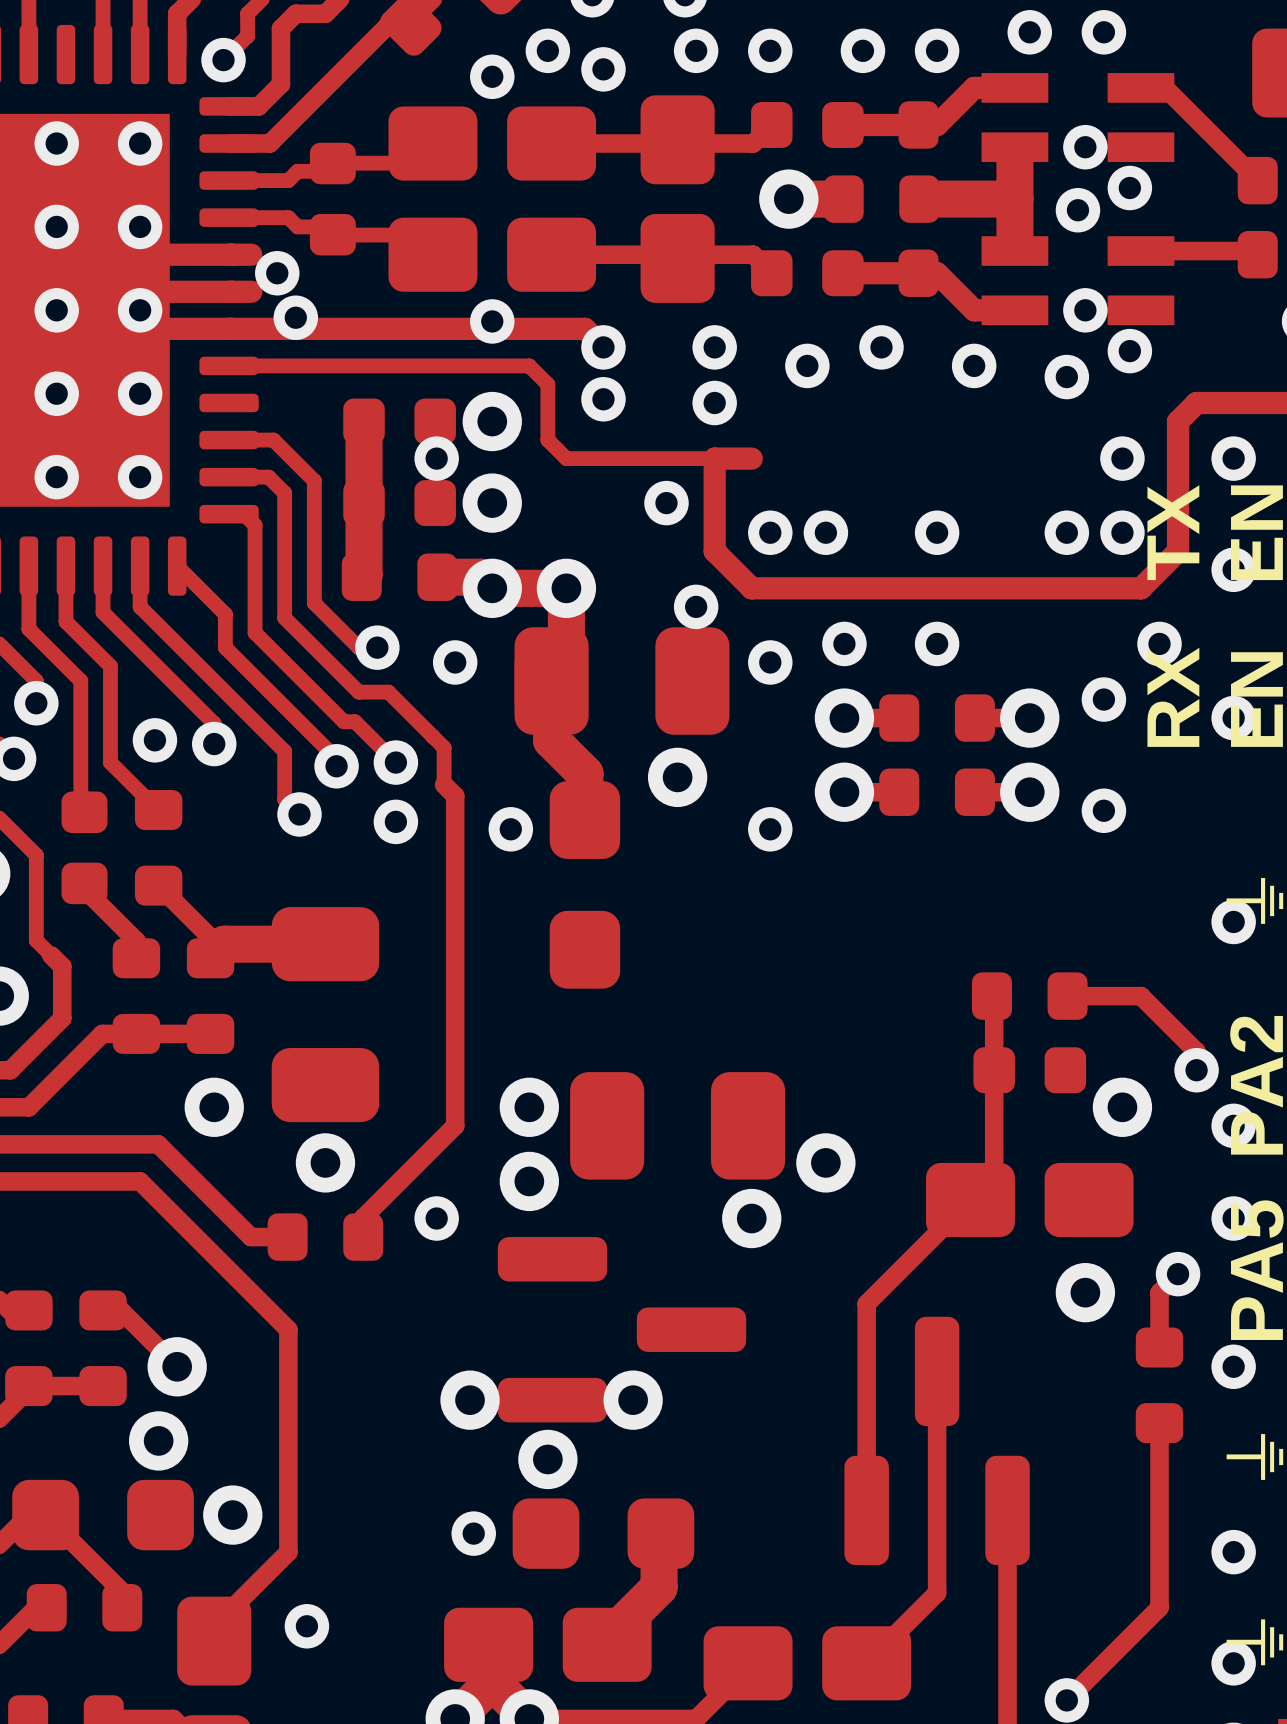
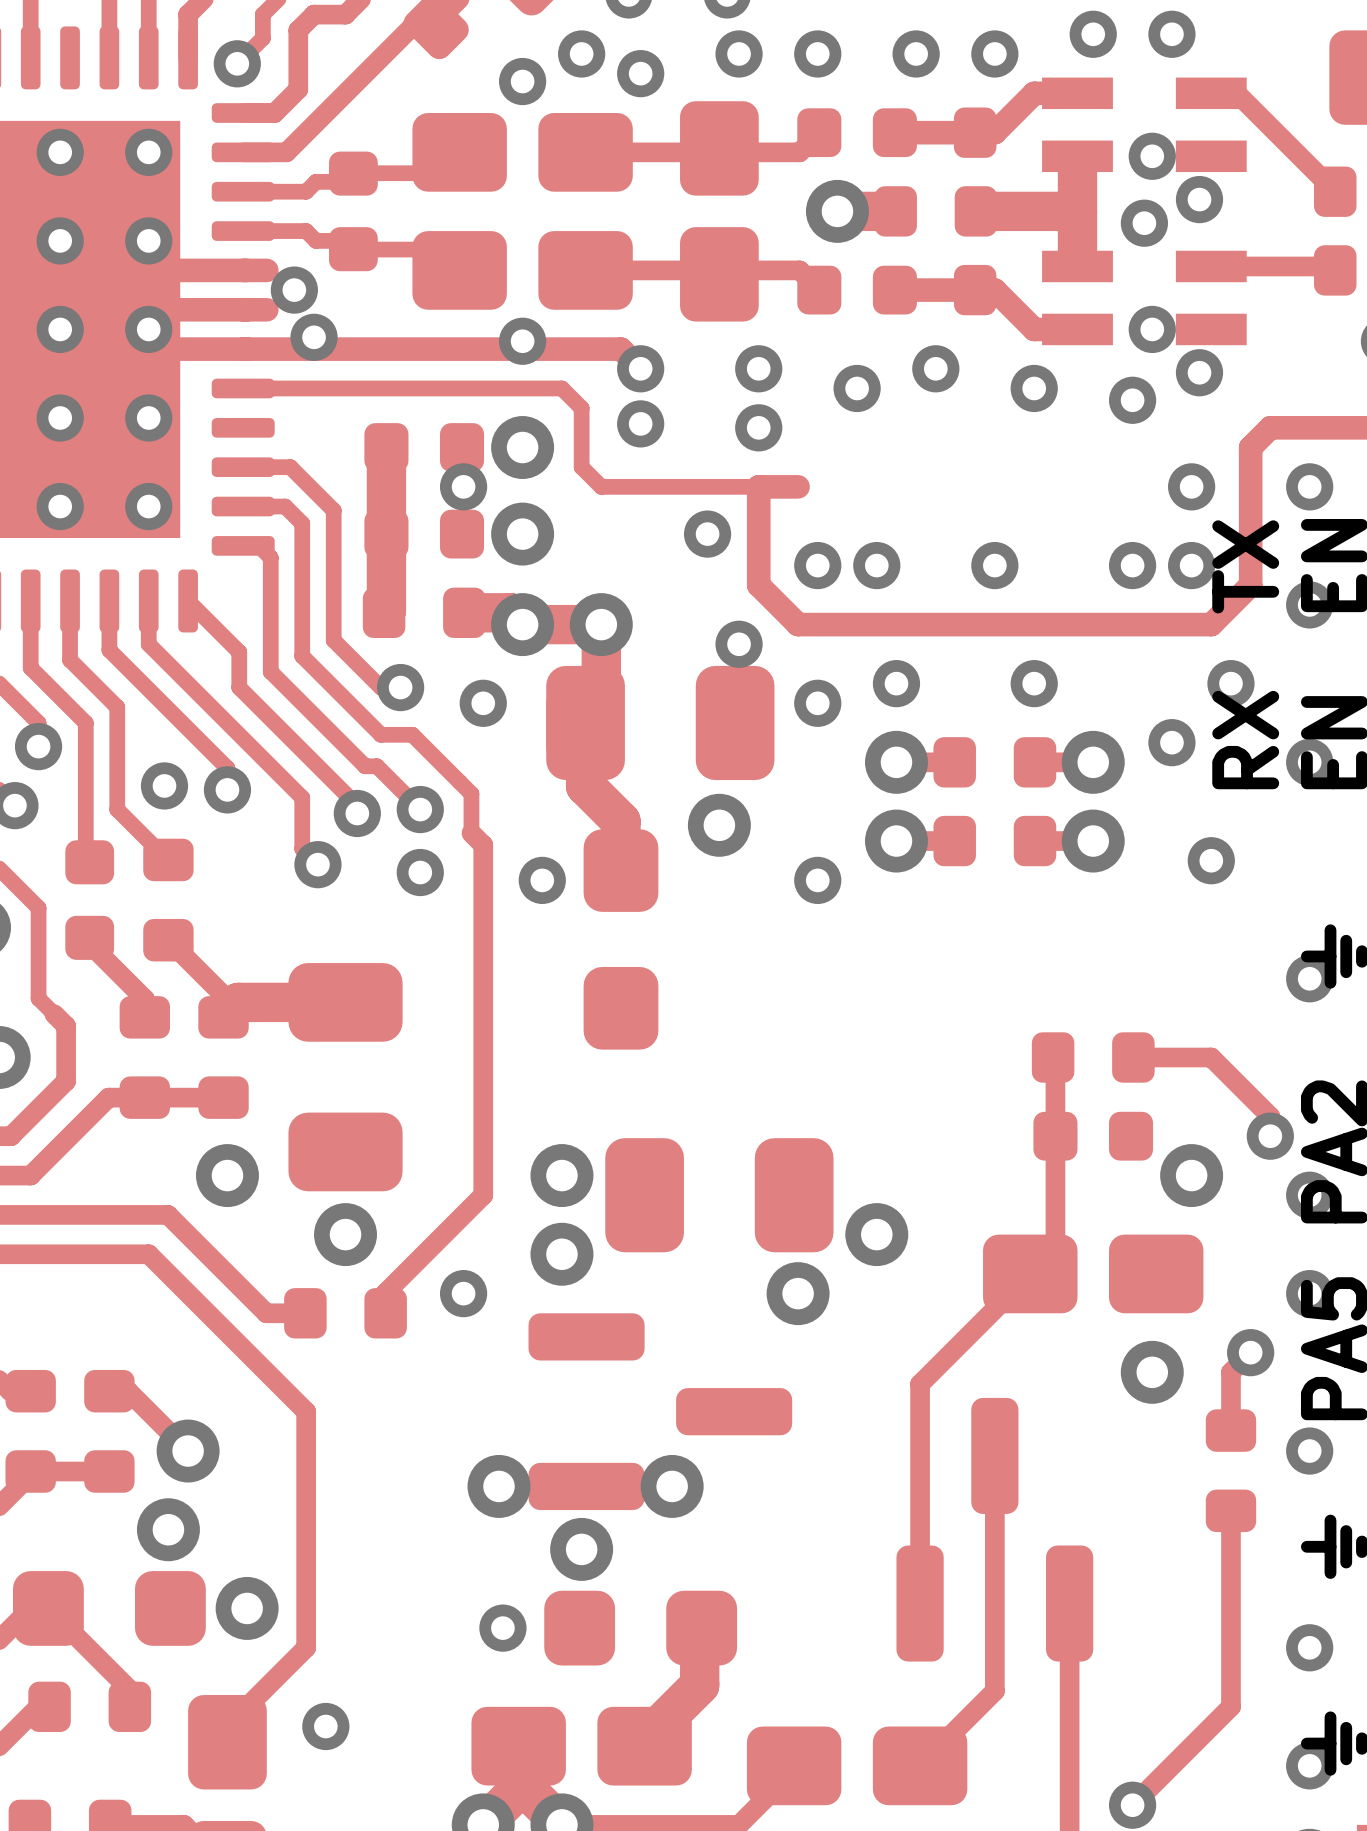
via position: (937, 643) -> (1034, 683)
via position: (1103, 810) -> (1211, 860)

